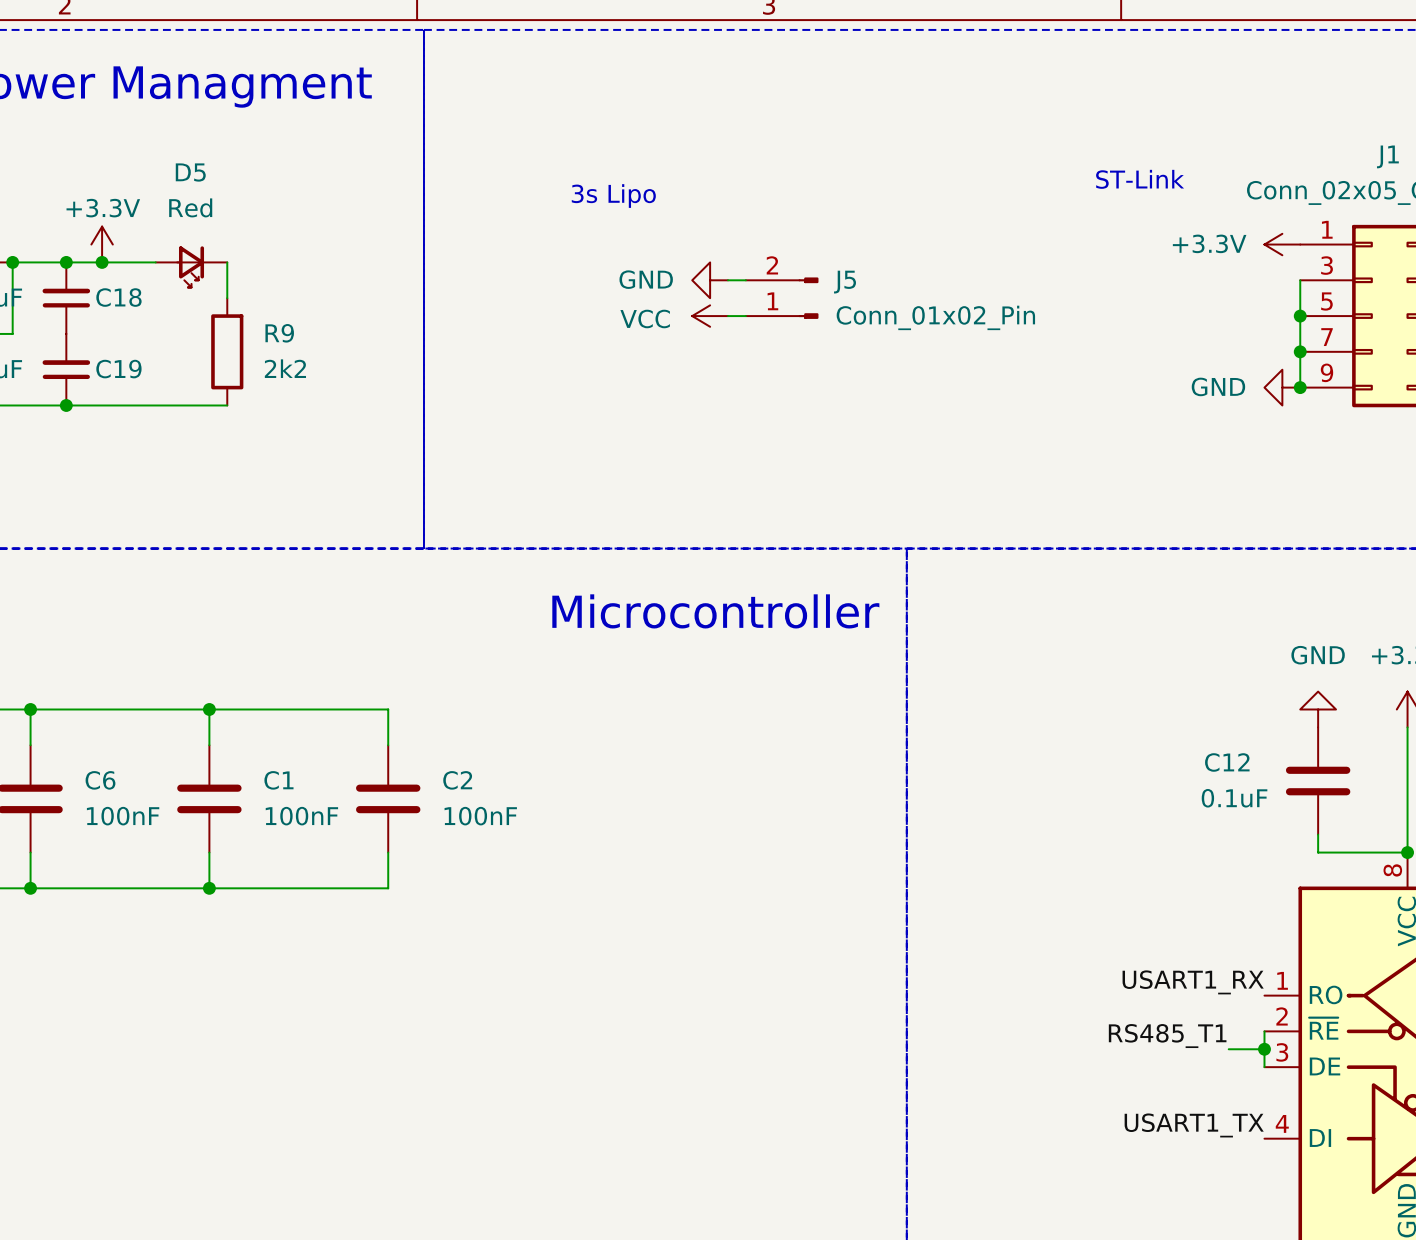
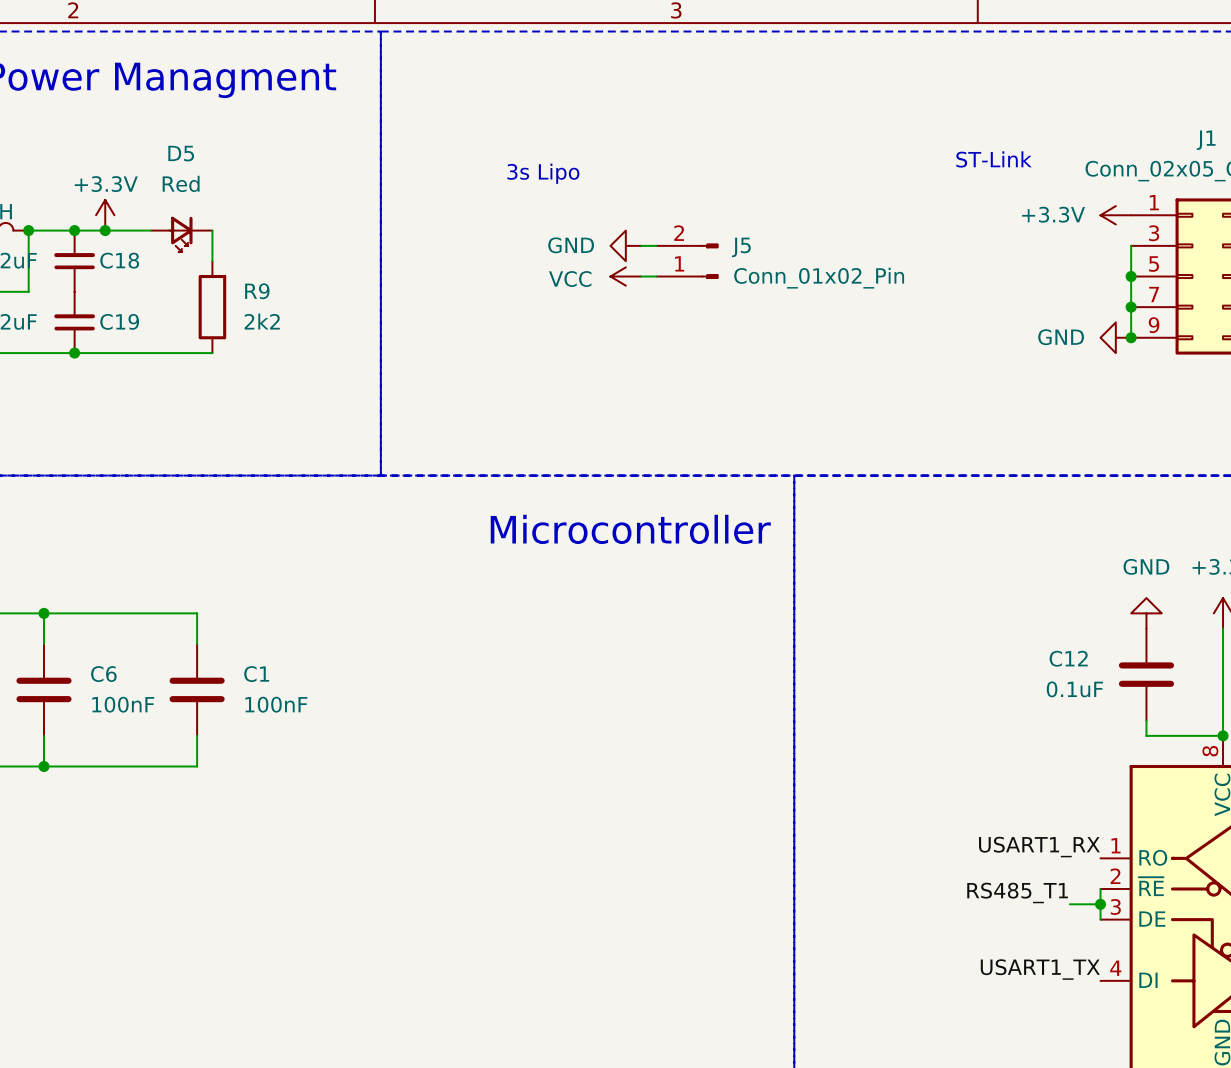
wire: (209, 709) (388, 709) (388, 745) -> none
junction: (209, 709) -> none
C2: 100nF (388, 798) -> none
wire: (388, 852) (388, 888) (209, 888) -> none
junction: (209, 888) -> none

